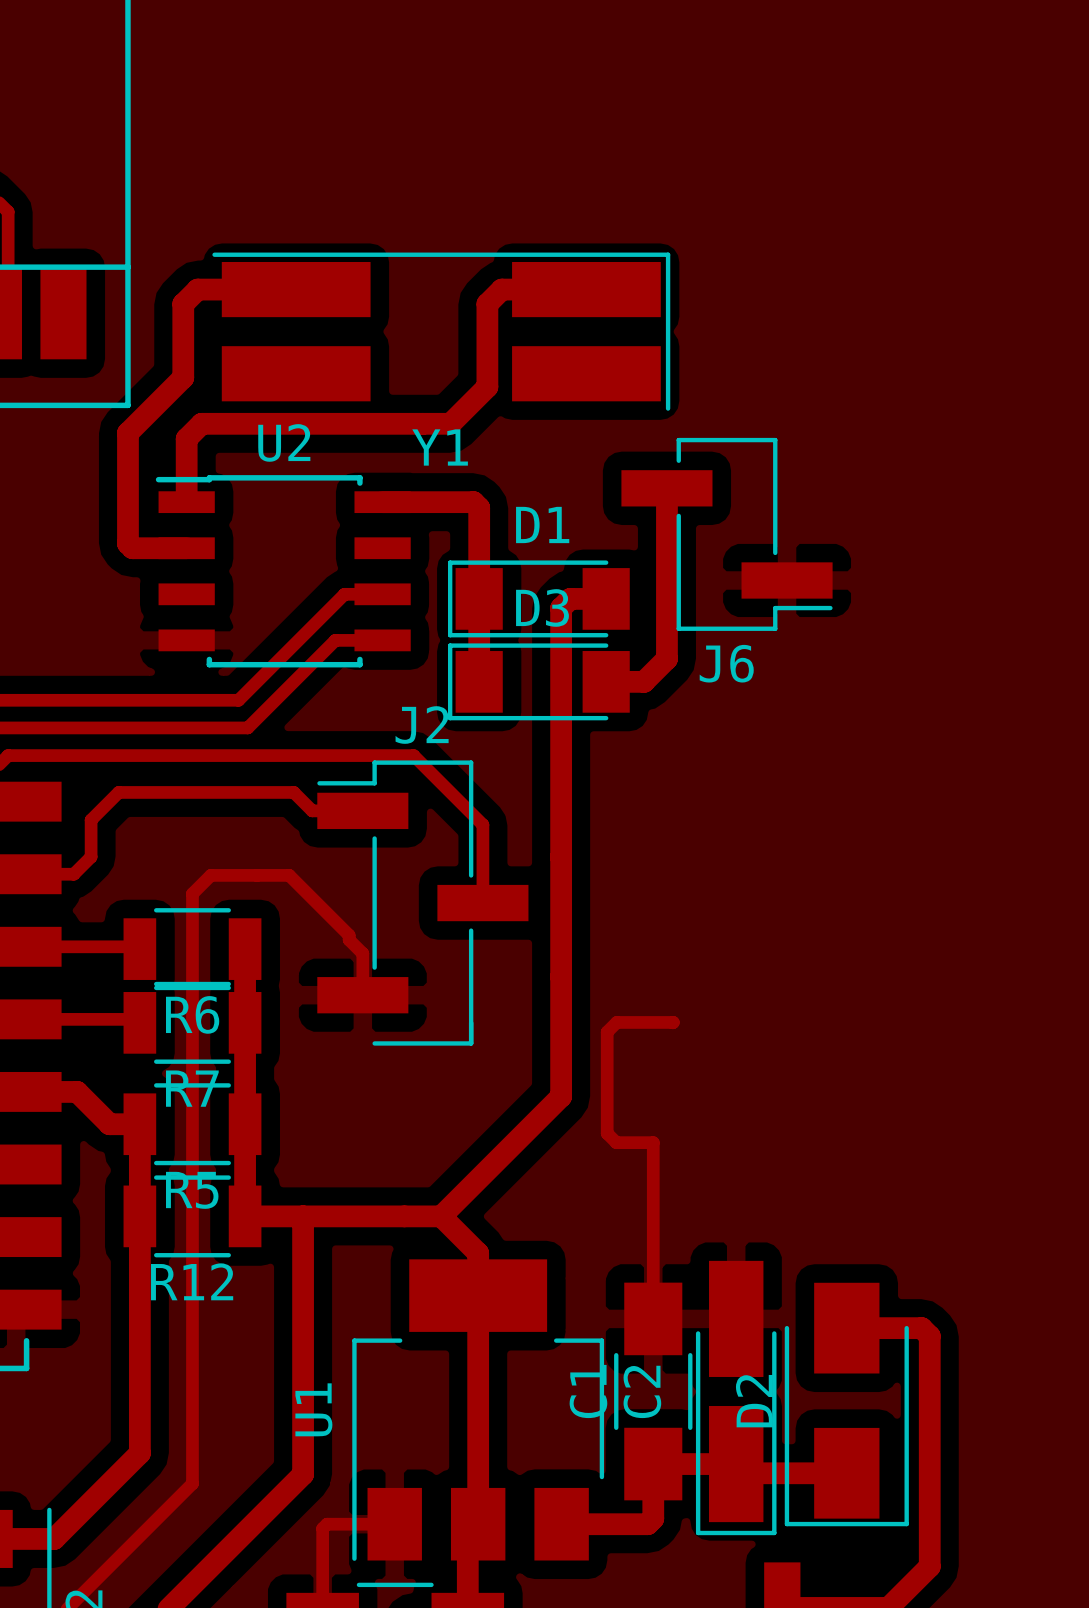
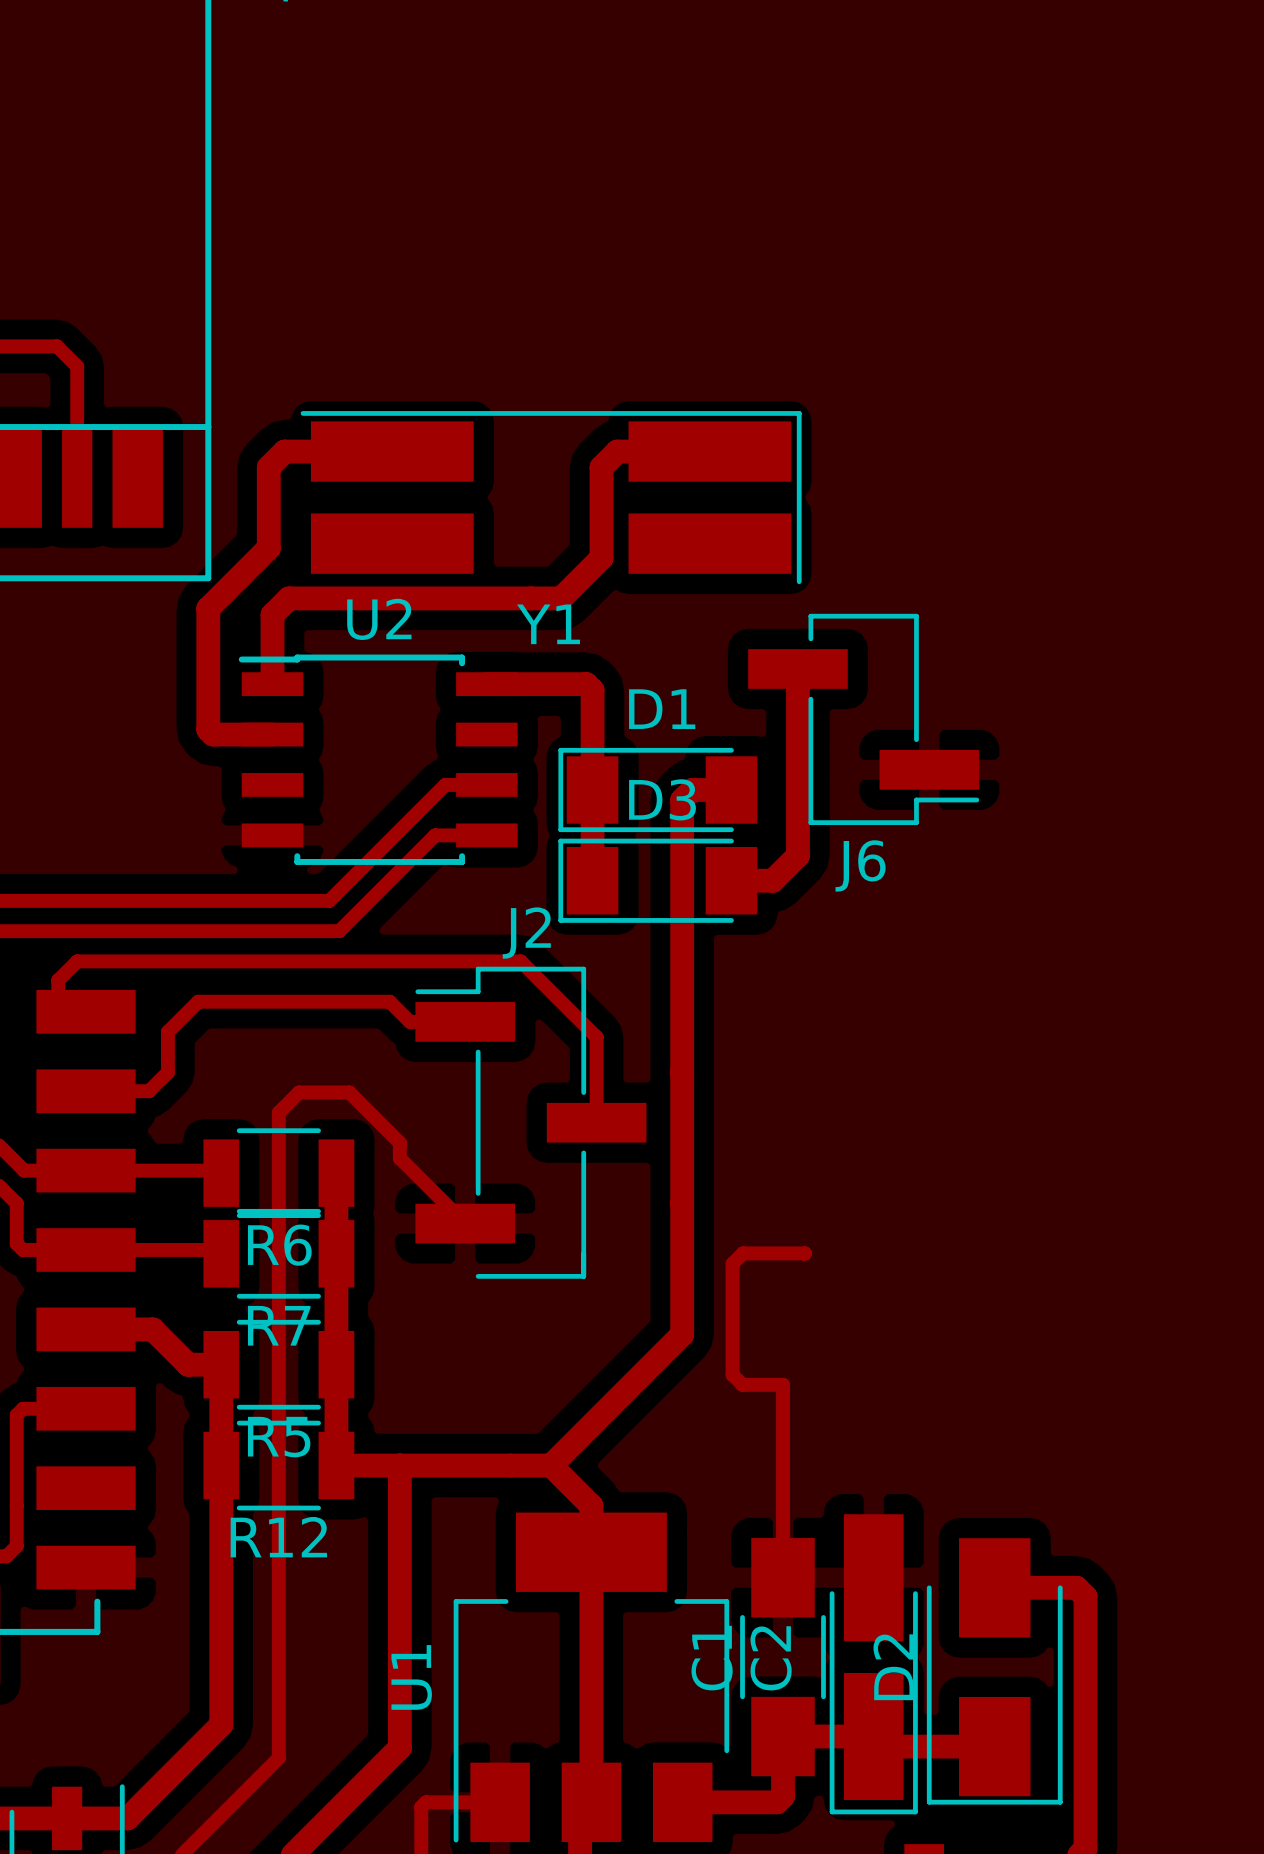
top track: (256, 875) (289, 875) (349, 935) (349, 939) (362, 953) (362, 995) -> (349, 1092) (399, 1142) (399, 1158) (465, 1223)

